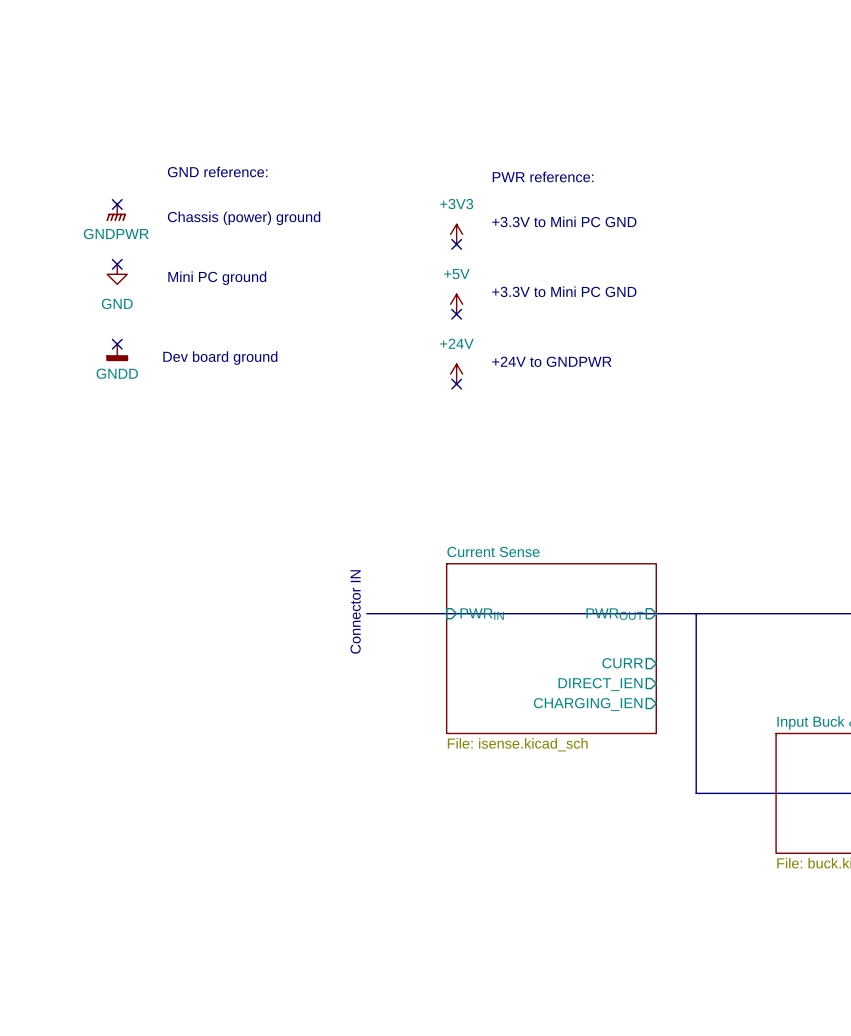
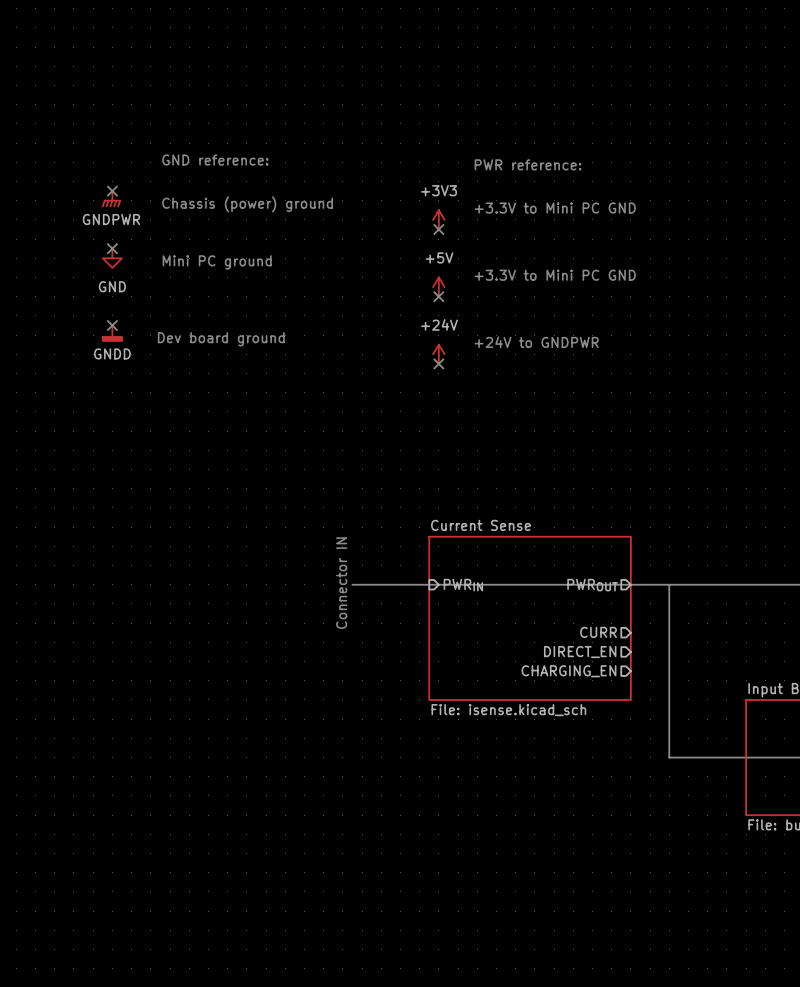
sheet pin: DIRECT_IEN (600, 684) -> DIRECT_EN (580, 652)
sheet pin: CHARGING_IEN (588, 704) -> CHARGING_EN (569, 671)

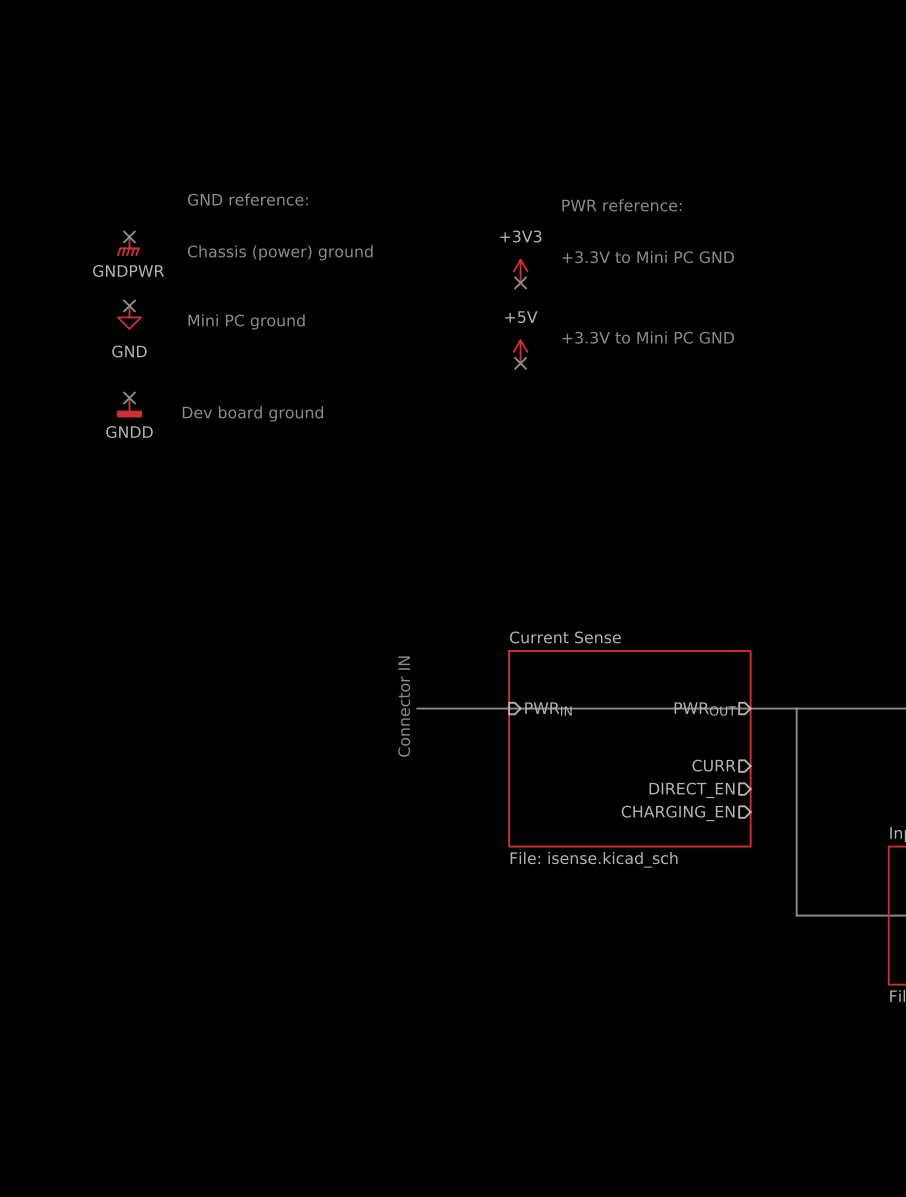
text: +24V to GNDPWR (536, 342) -> none
power symbol: +24V (438, 354) -> none
no-connect mark: (438, 363) -> none

